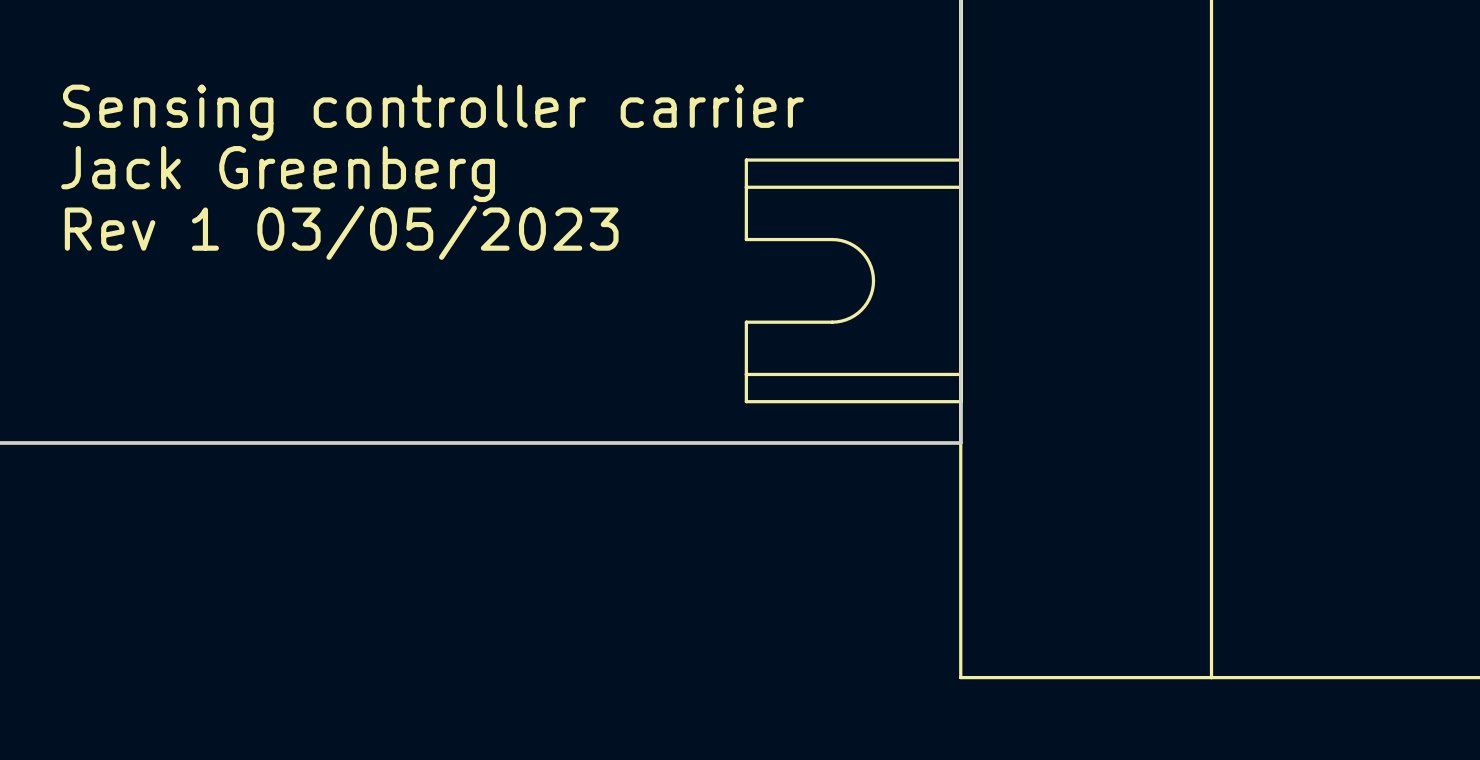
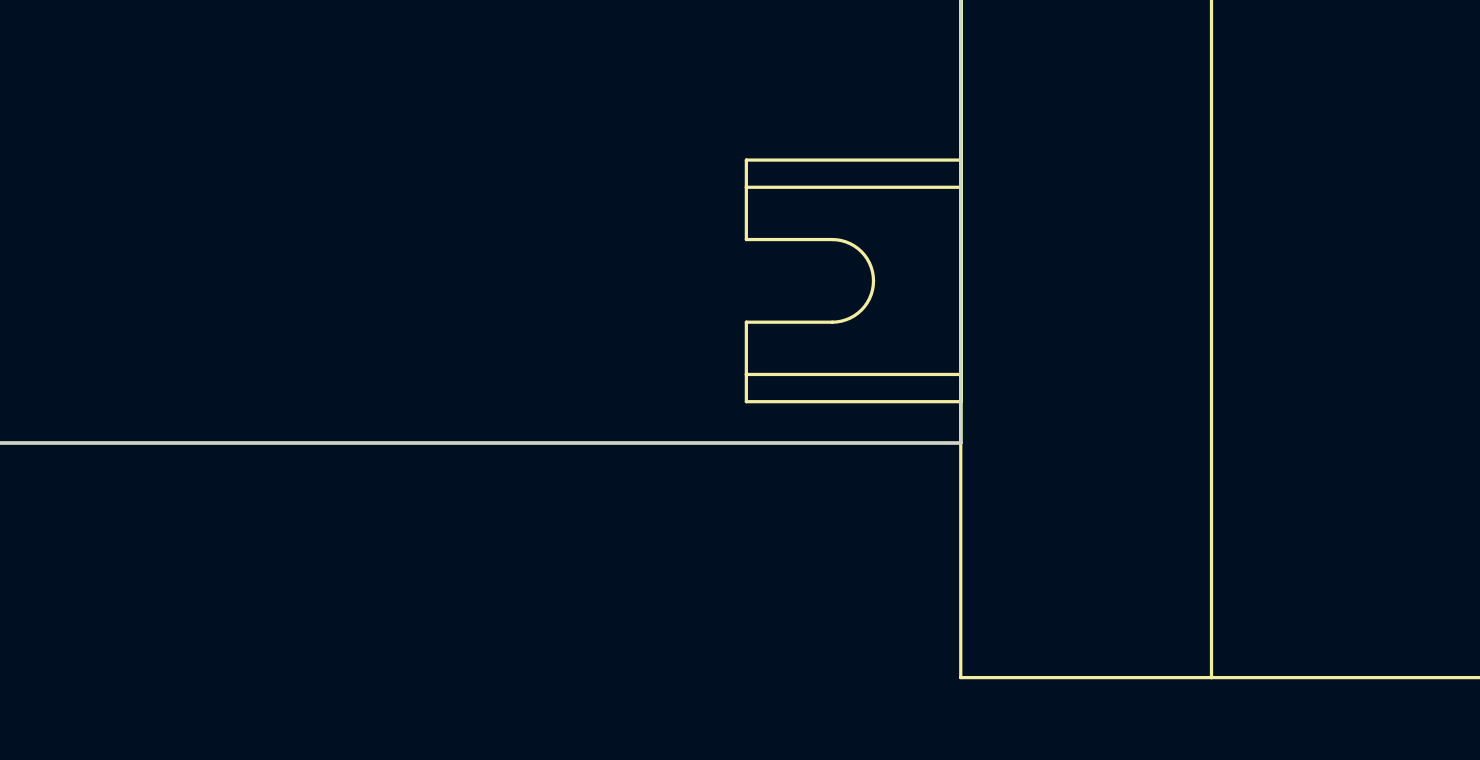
text: Sensing controller carrier (433, 112) -> none
text: Jack Greenberg (278, 174) -> none
text: Rev 1 03/05/2023 (341, 232) -> none

